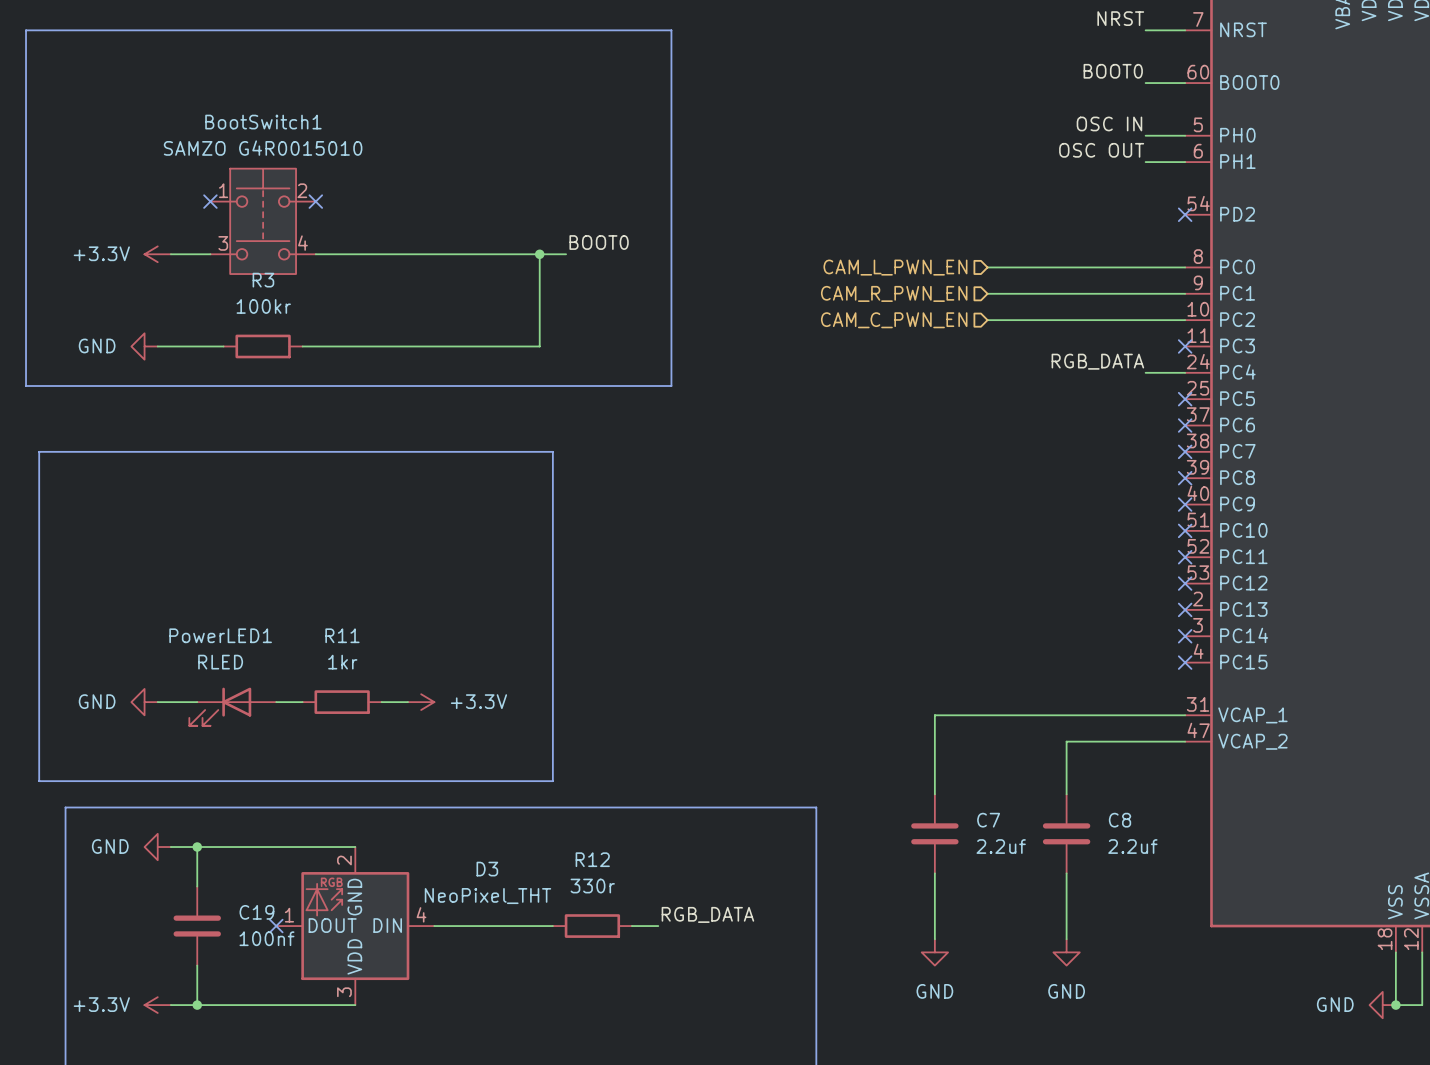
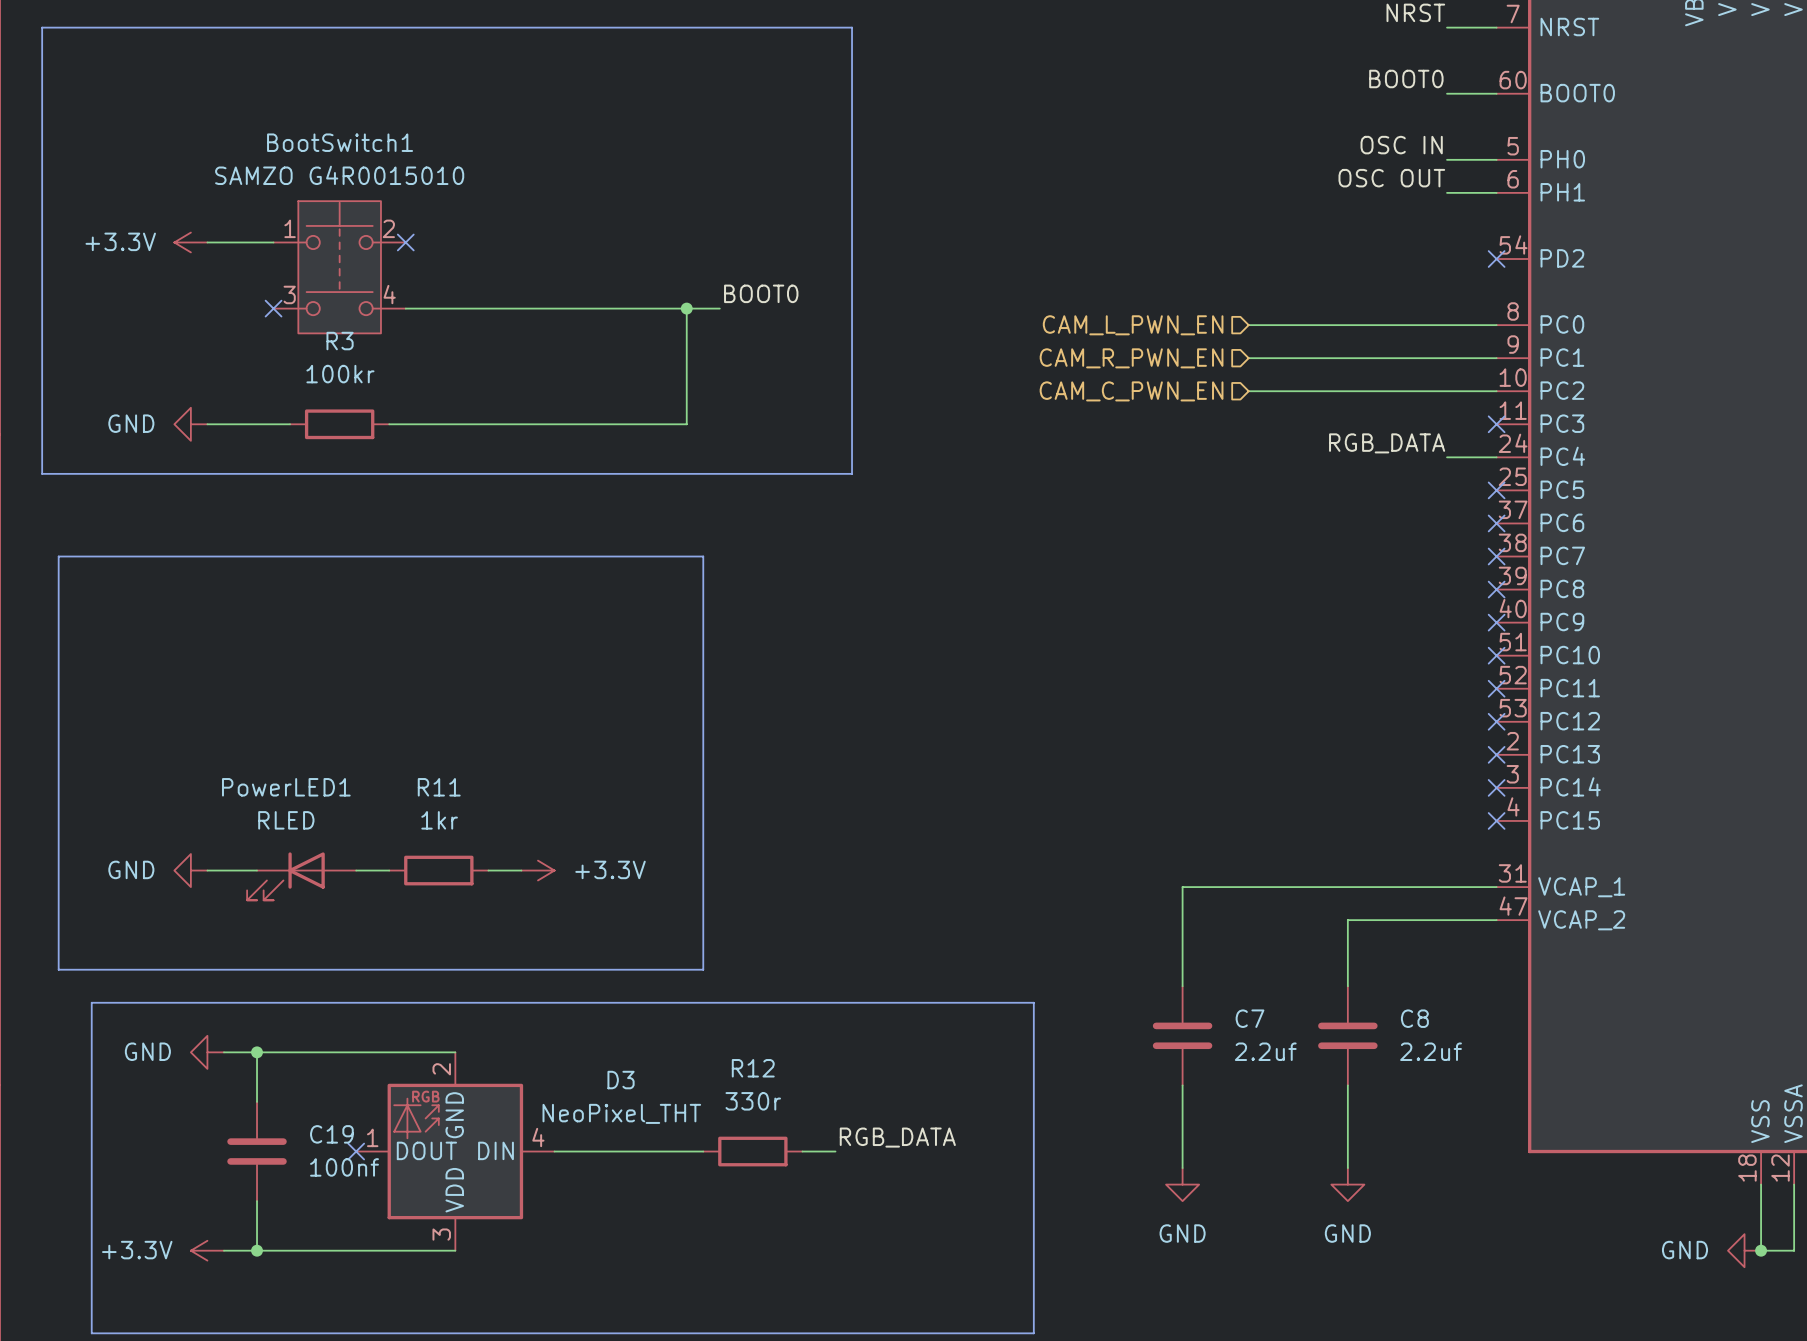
wire: none -> (207, 242) (273, 242)
no-connect mark position: (210, 201) -> (273, 308)
power symbol position: +3.3V (157, 254) -> +3.3V (190, 242)
wire: (170, 254) (210, 254) -> none

